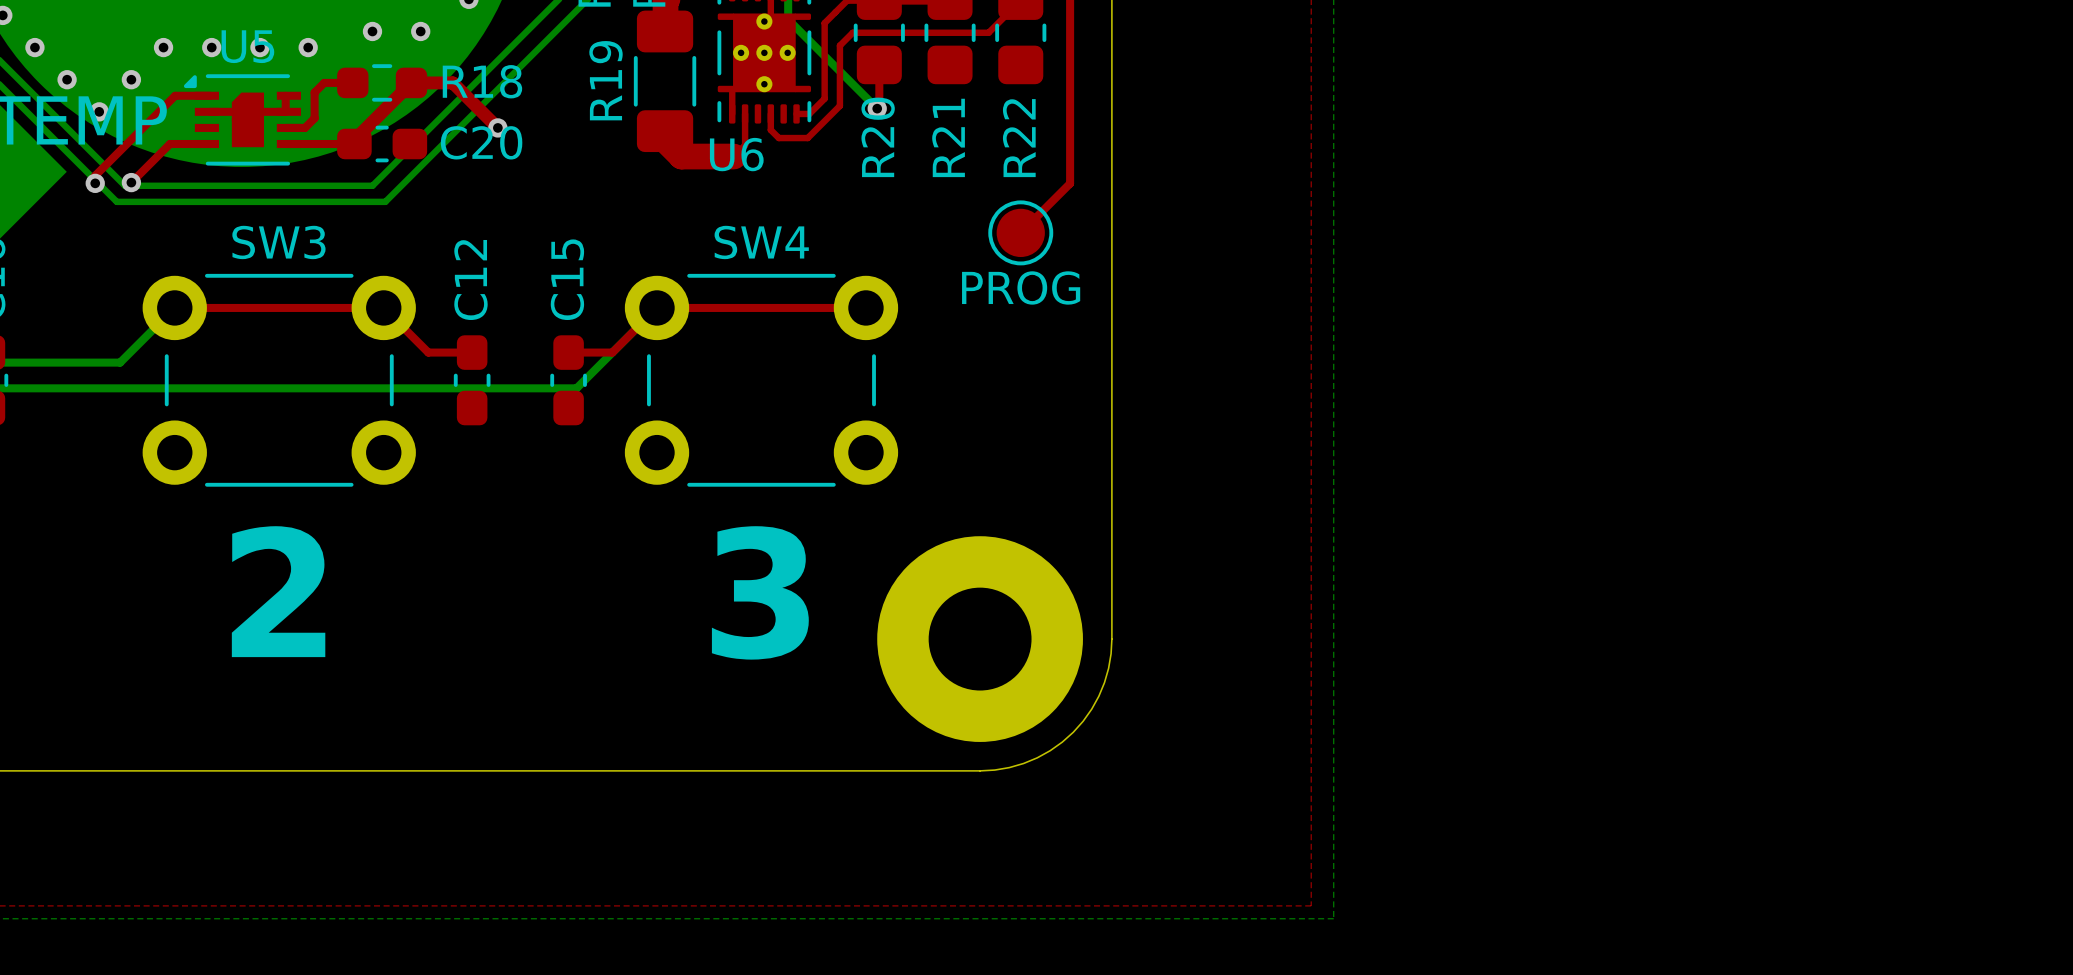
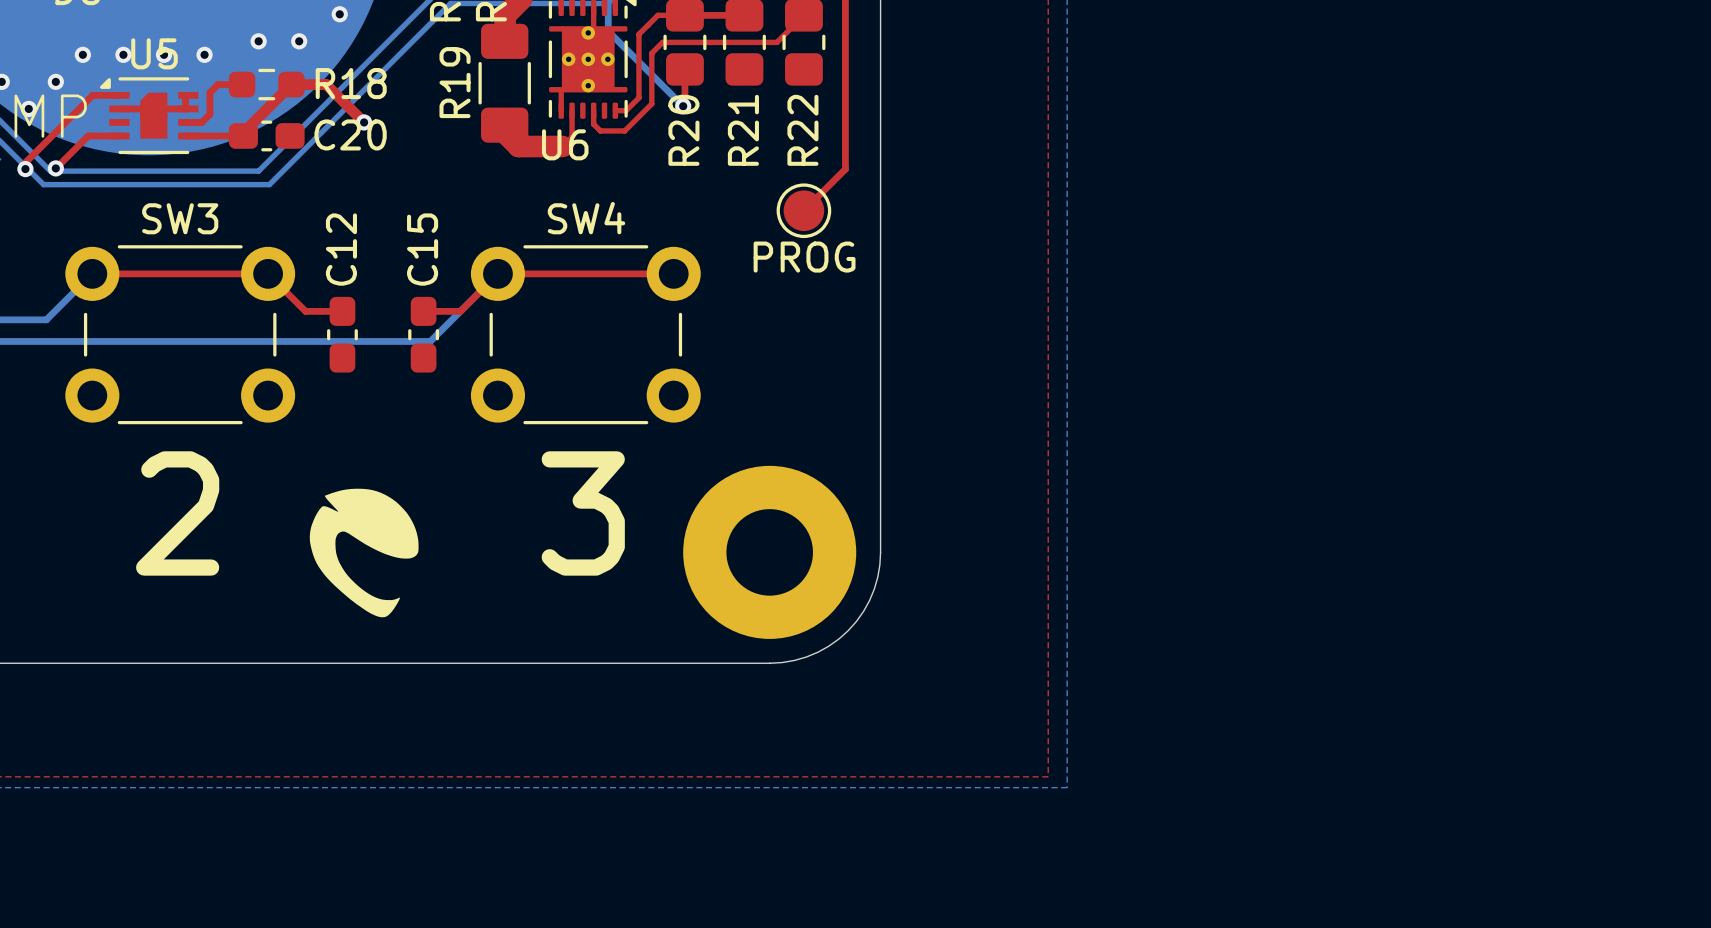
drawing: none -> [309, 488, 419, 618]

